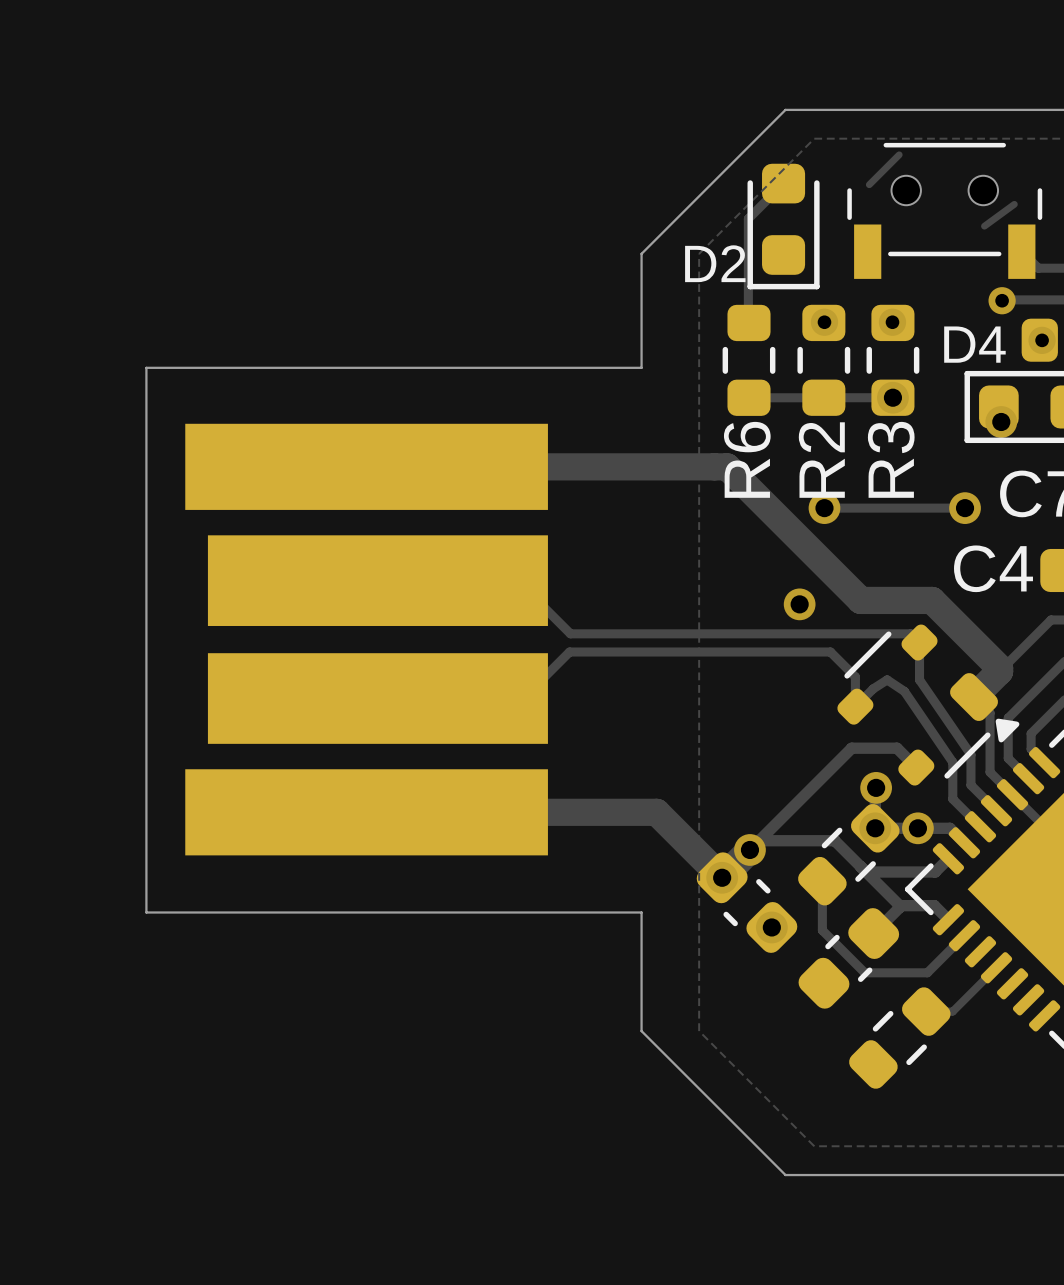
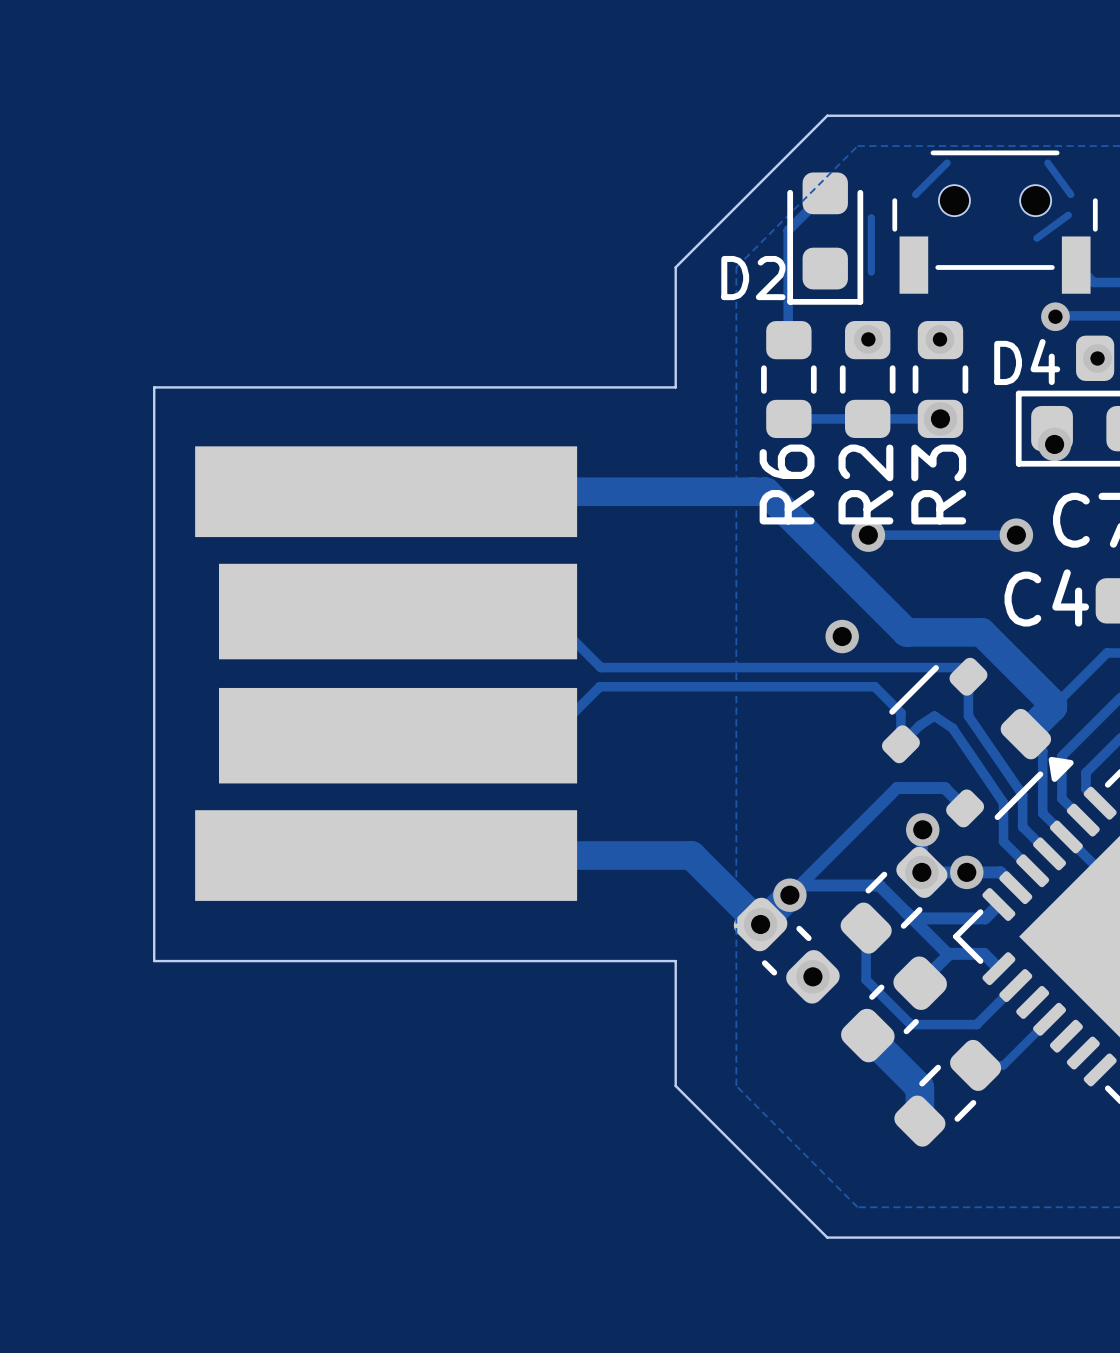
track: none -> (1047, 163) (1070, 194)
track: none -> (871, 217) (871, 272)
track: none -> (867, 1035) (919, 1087) (919, 1121)

